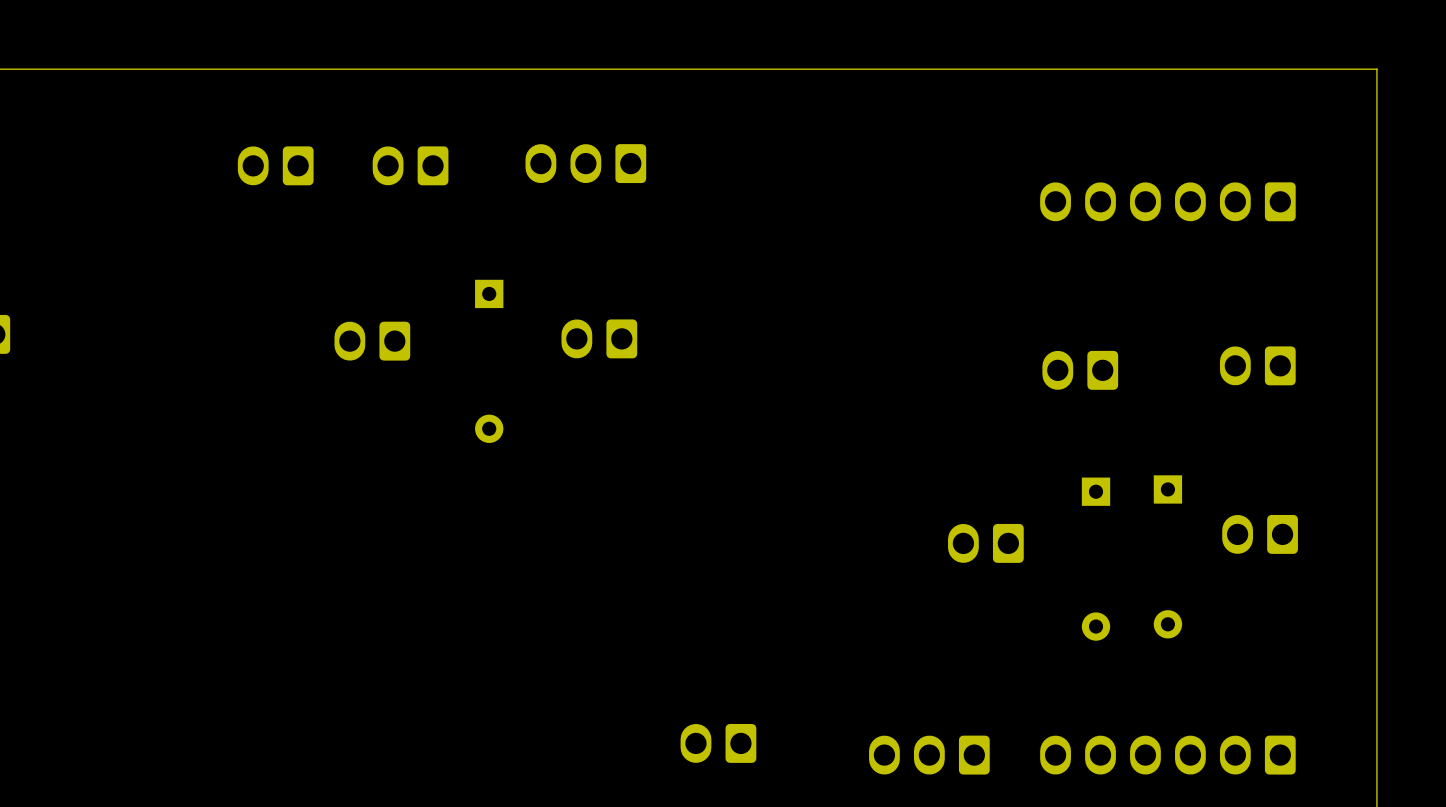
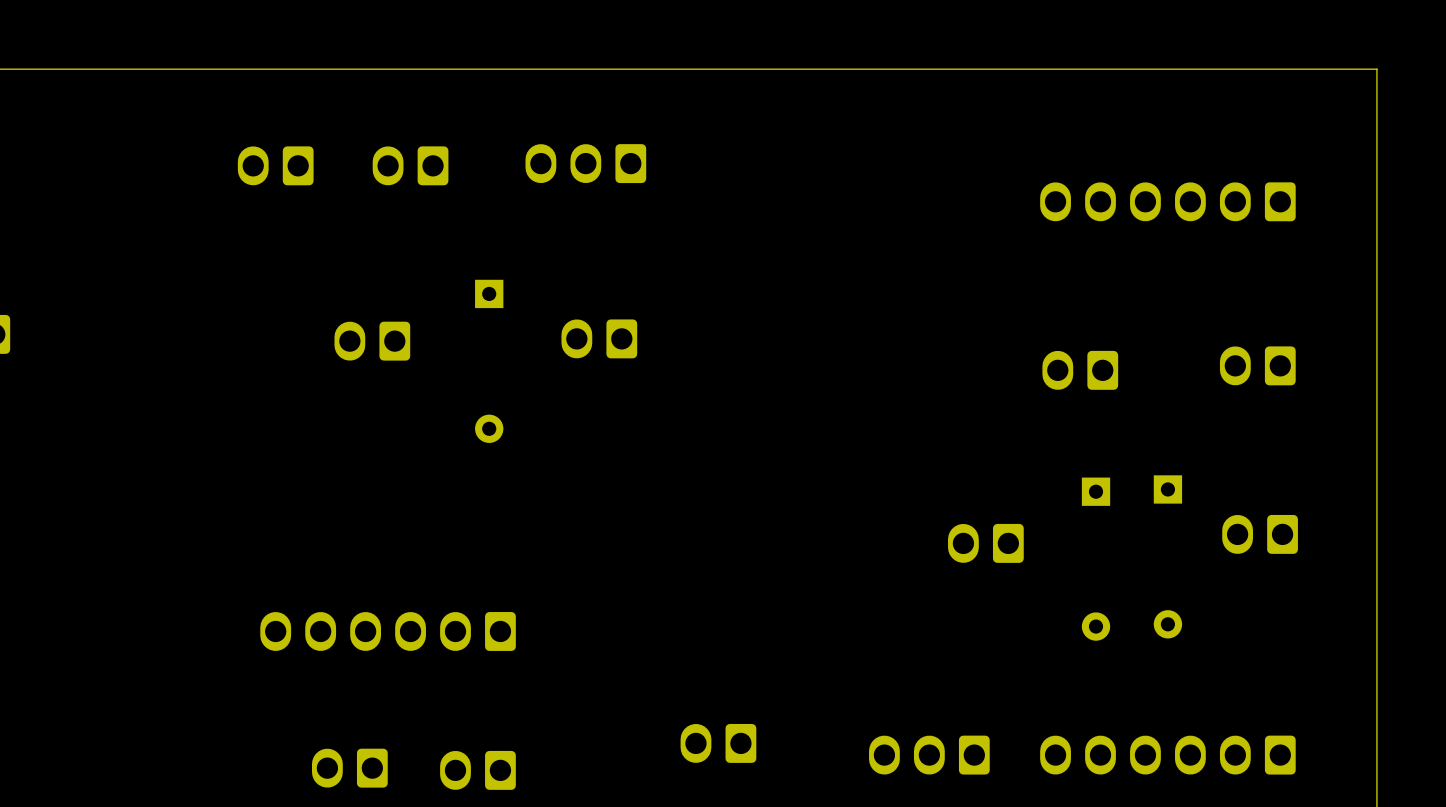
part: none -> (388, 631)
part: none -> (349, 768)
part: none -> (477, 770)

